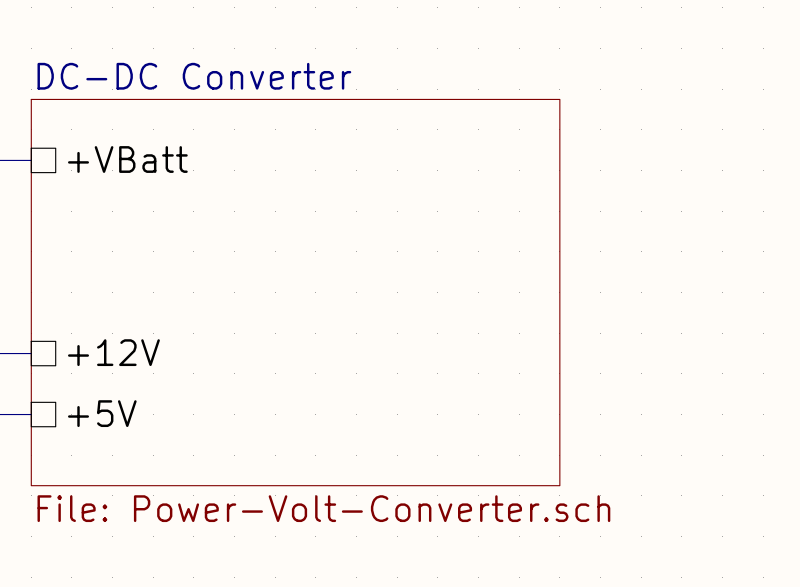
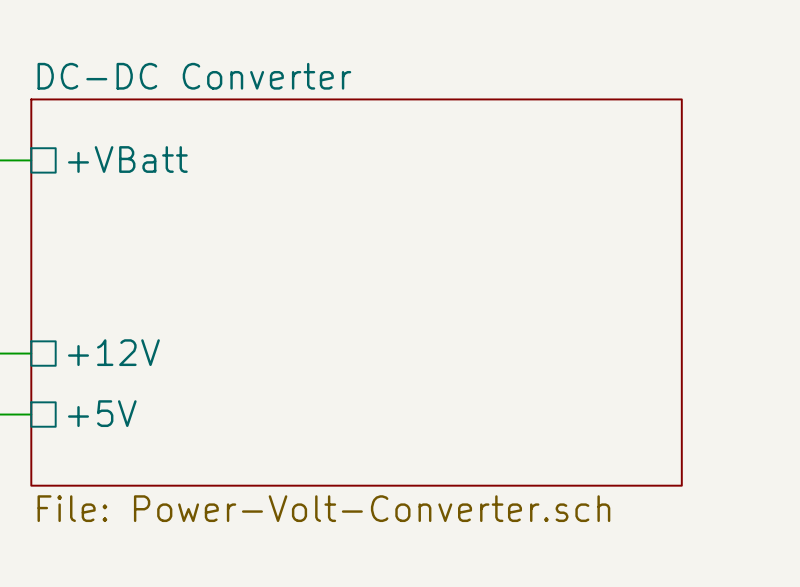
sheet DC-DC Converter: File: Power-Volt-Converter.sch (295, 292) -> none
sheet DC-DC Converter: none -> File: Power-Volt-Converter.sch (356, 292)

